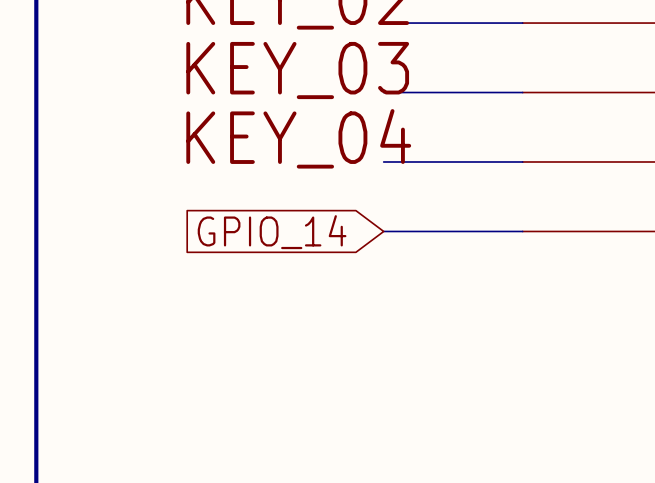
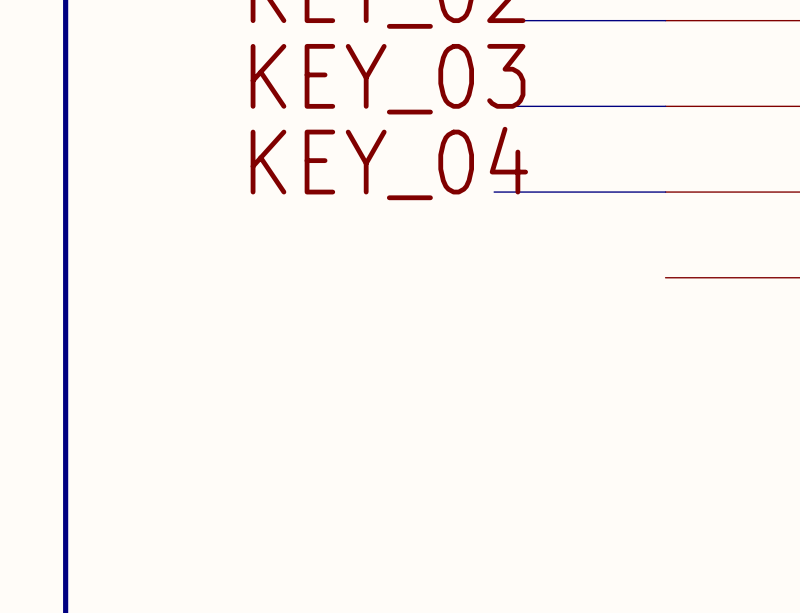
wire: (383, 231) (522, 231) -> none
global label: GPIO_14 (272, 232) -> none

